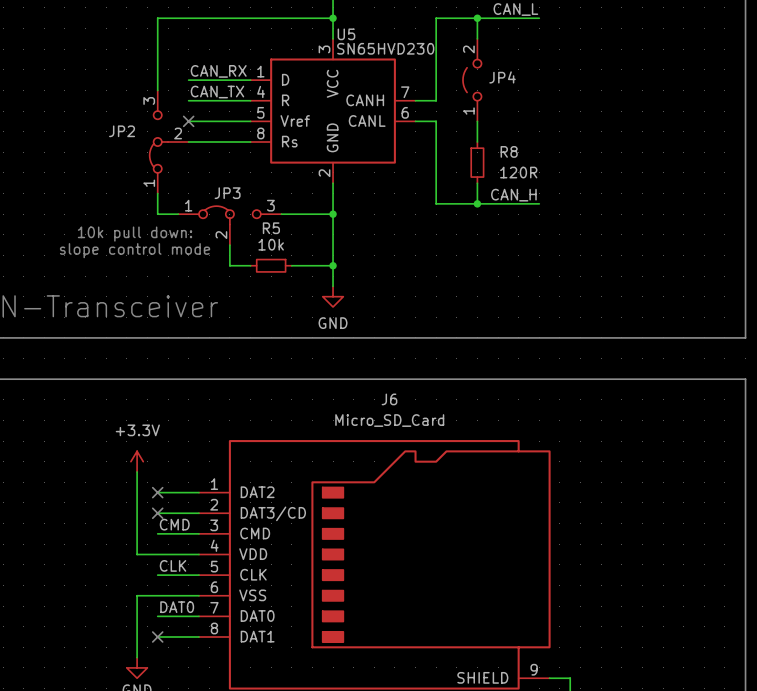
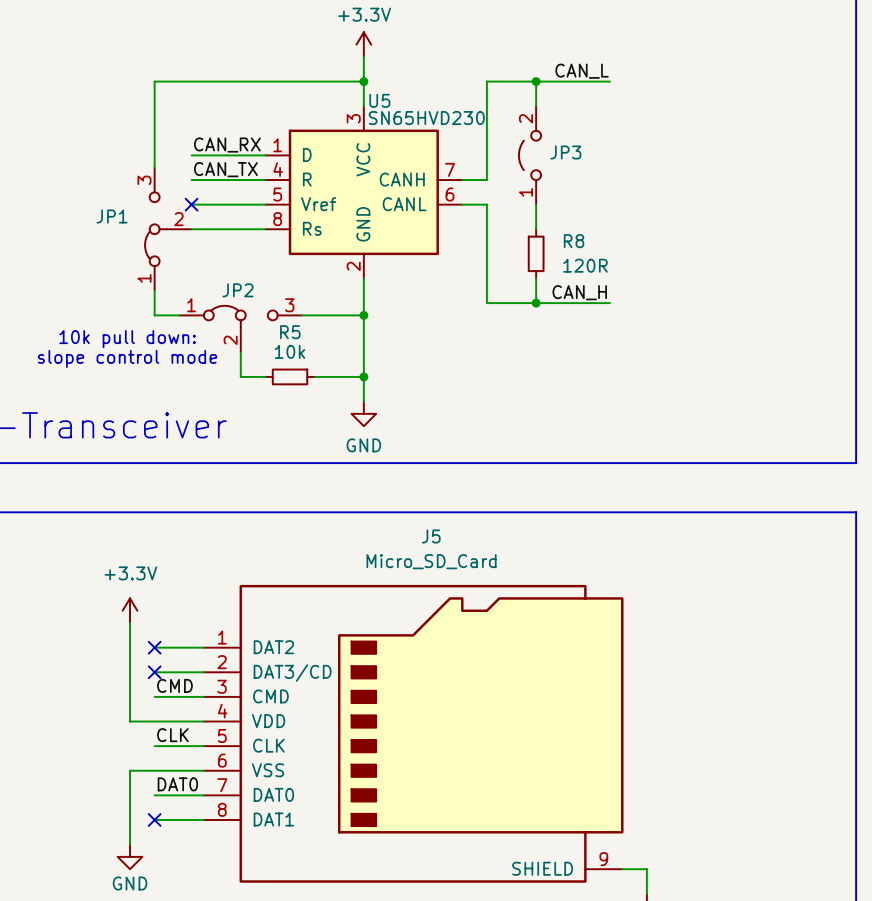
JP4 name: JP4 (502, 77) -> JP3 (565, 152)
JP2 name: JP2 (122, 131) -> JP1 (112, 216)
JP3 name: JP3 (227, 193) -> JP2 (238, 290)
J6 name: J6 (389, 399) -> J5 (431, 536)

